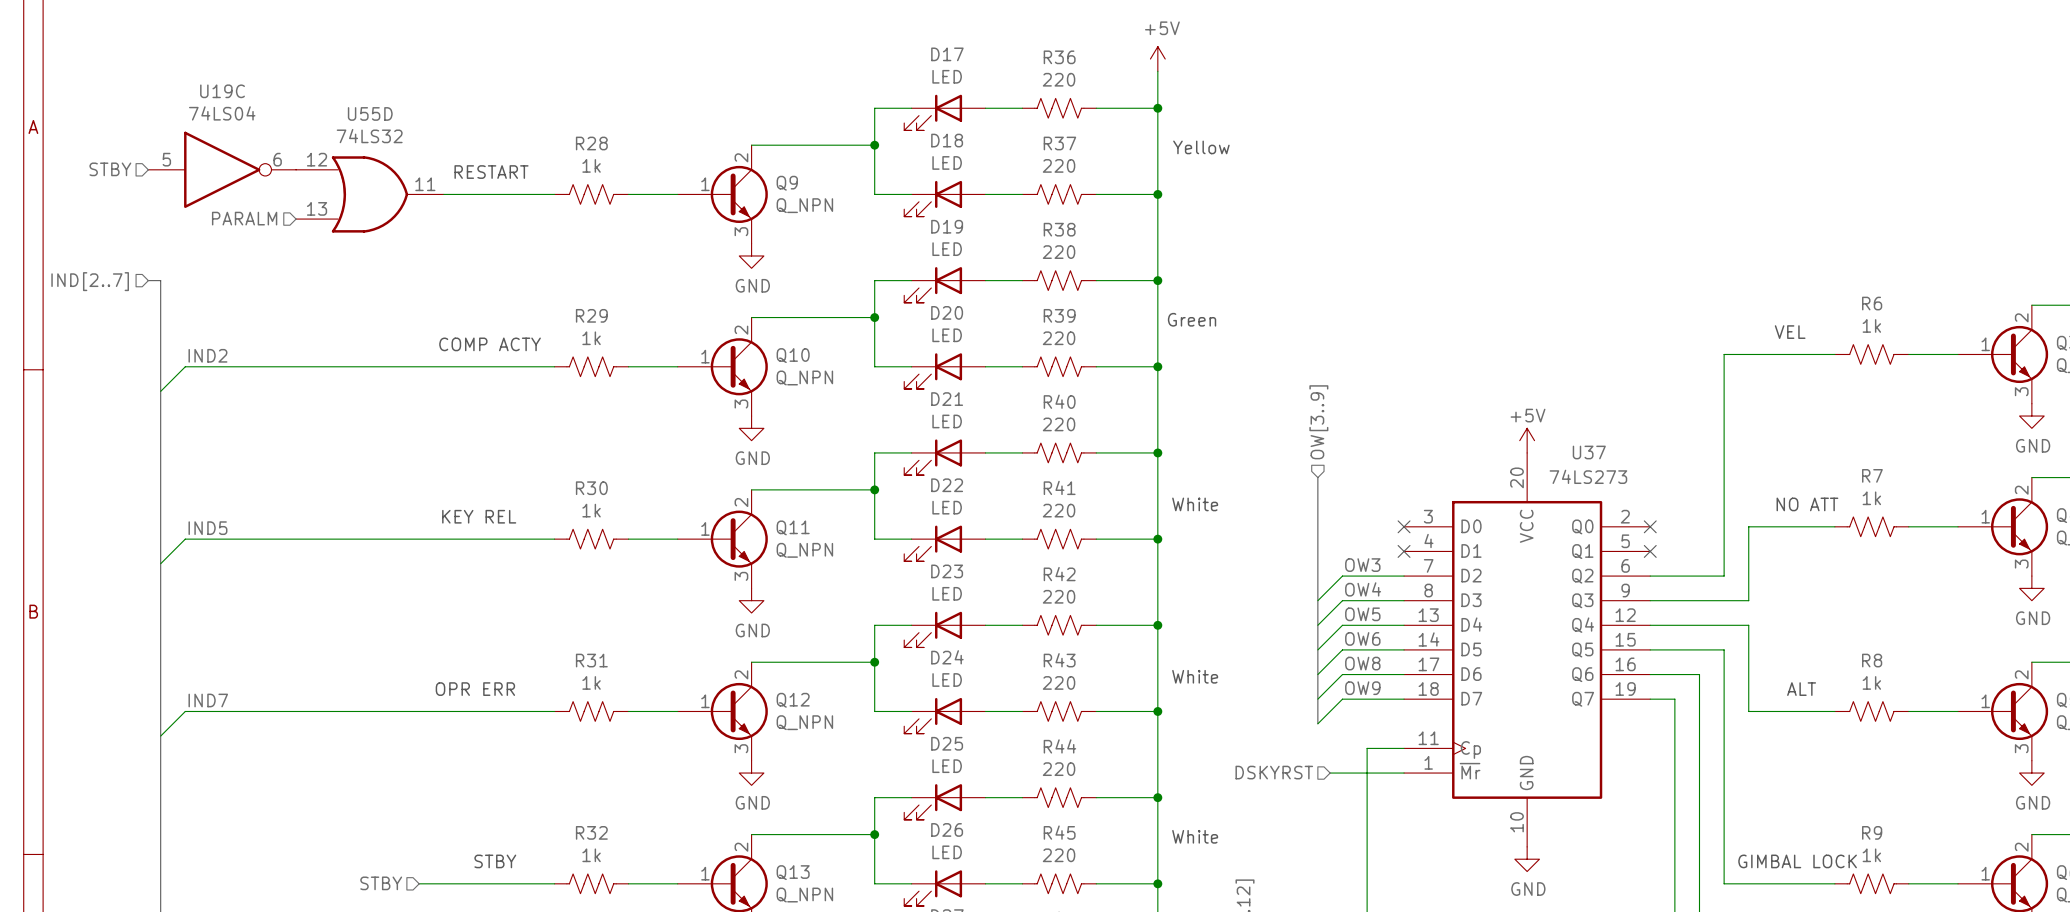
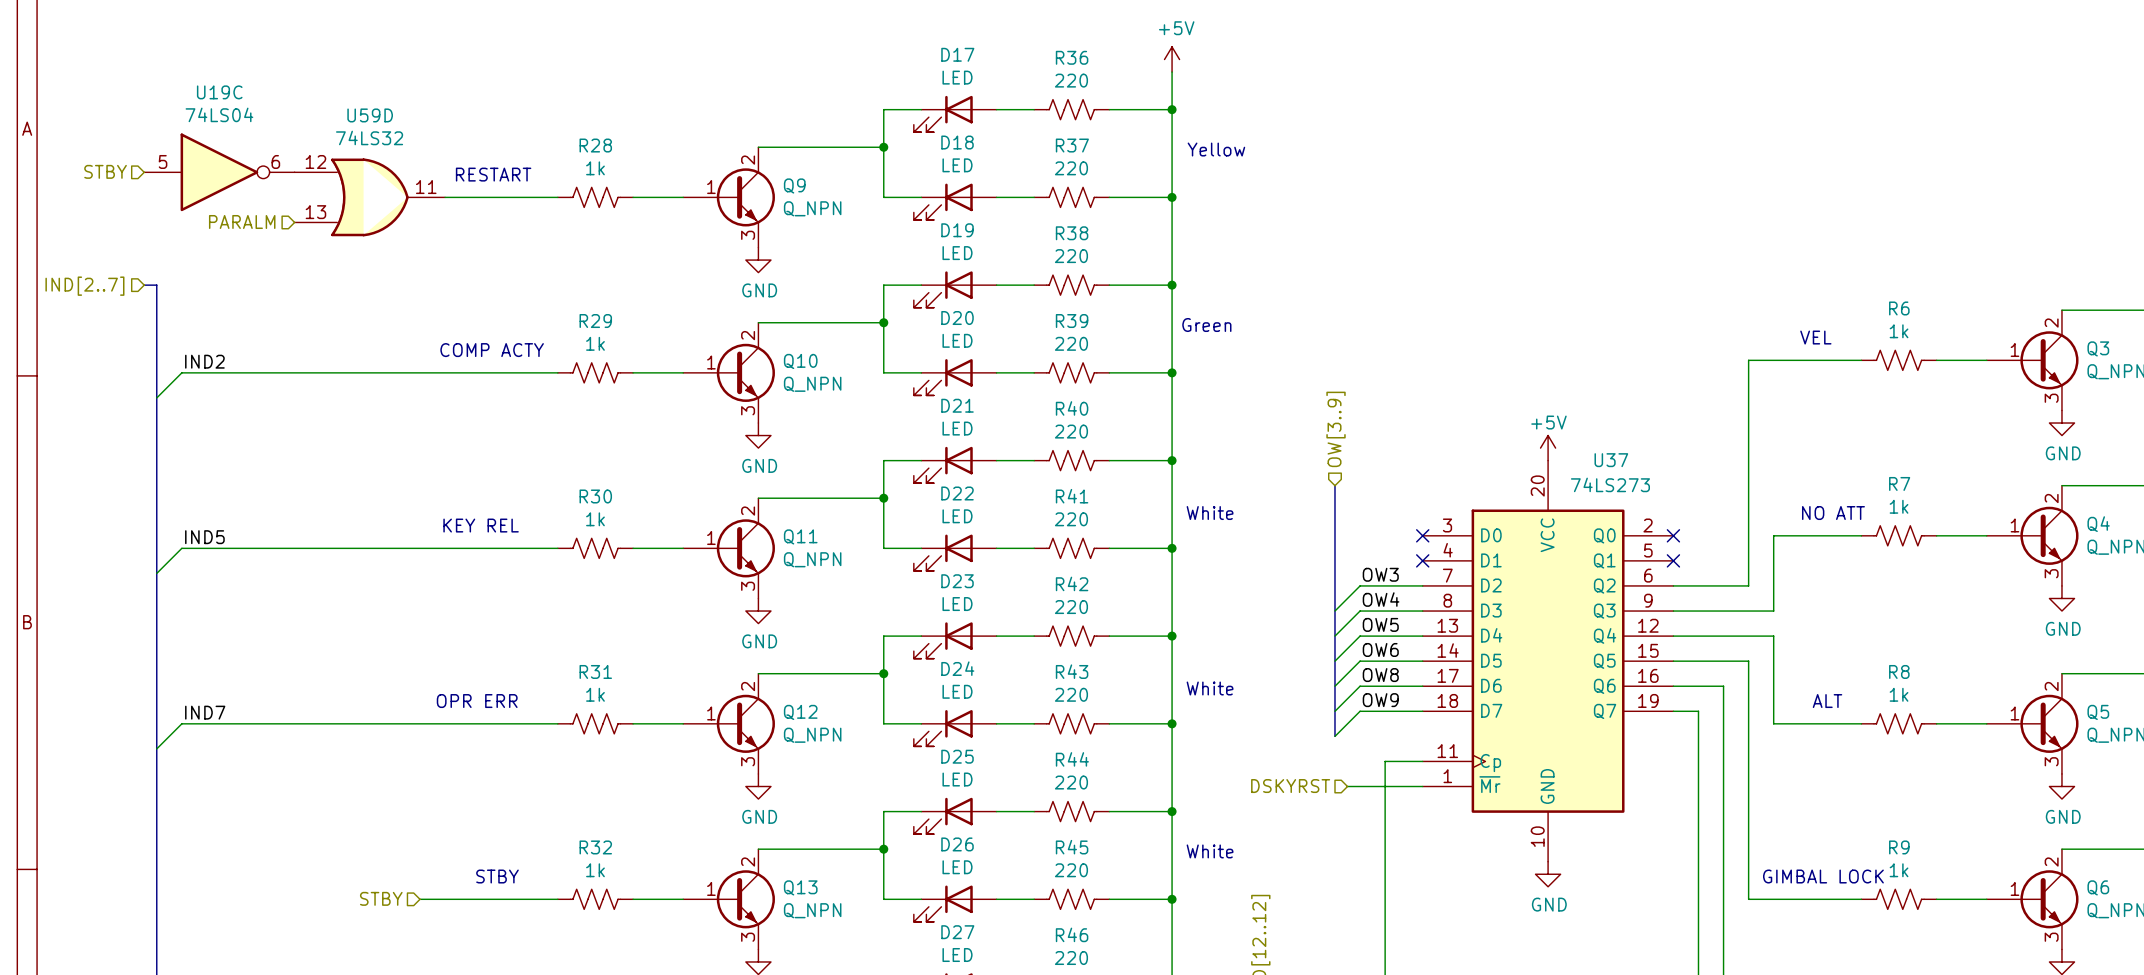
U55D name: U55D (370, 113) -> U59D (370, 115)

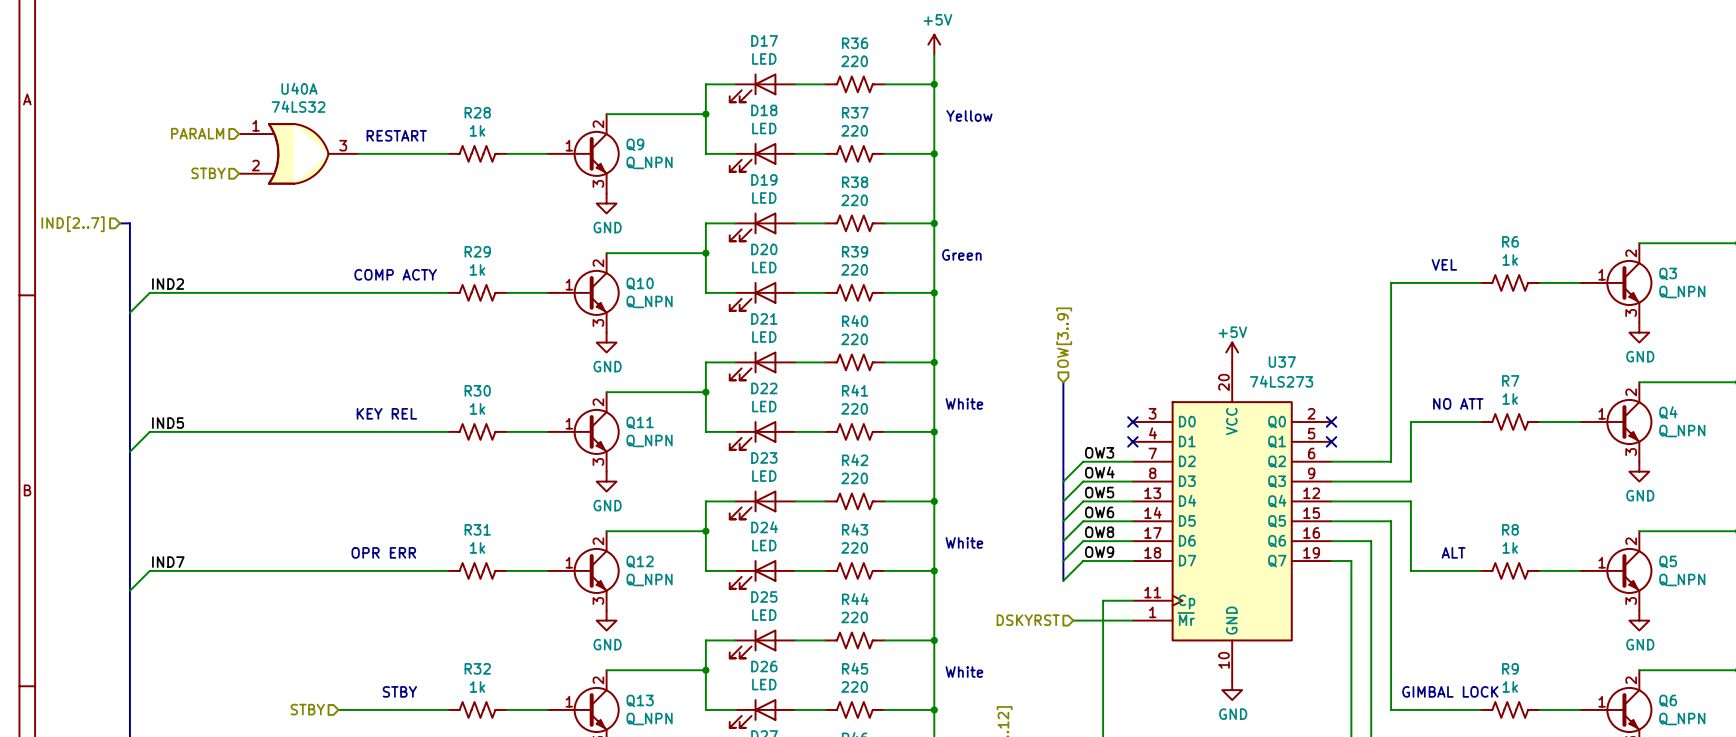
U59D name: U59D (370, 115) -> U40A (299, 88)
U59D pin number: 12 (315, 161) -> 1 (256, 125)
hierarchical label: STBY (105, 171) -> none
hierarchical label: none -> PARALM (197, 133)
U19C: 74LS04 (219, 172) -> none
U59D pin number: 11 (426, 187) -> 3 (343, 145)
U59D pin number: 13 (315, 212) -> 2 (255, 165)
hierarchical label: PARALM (242, 221) -> STBY (208, 173)

